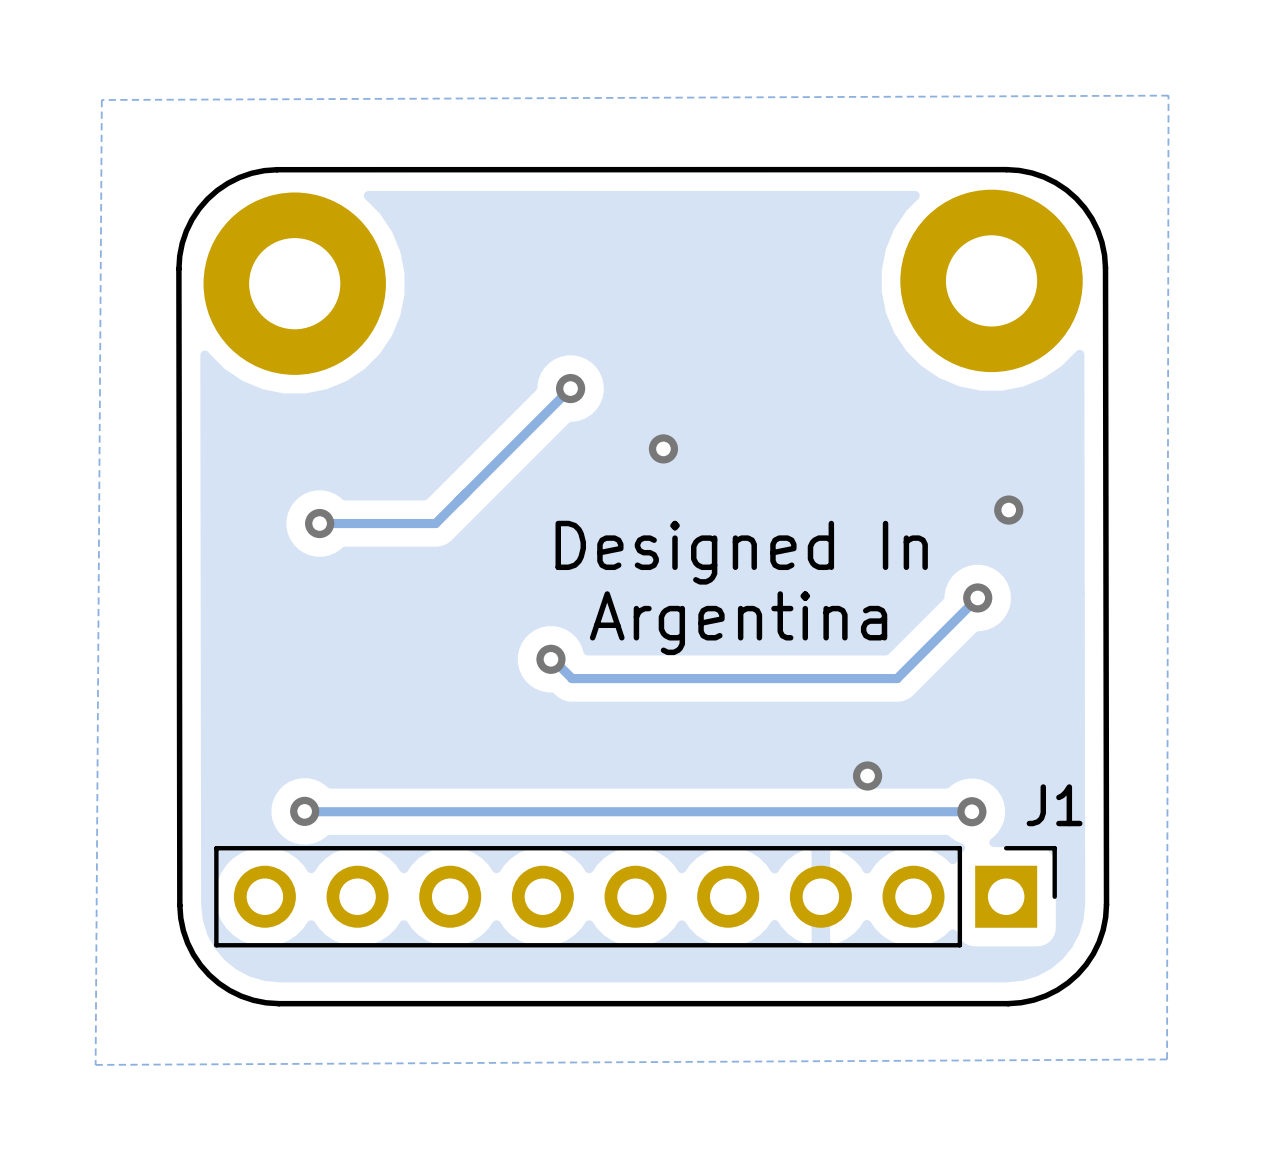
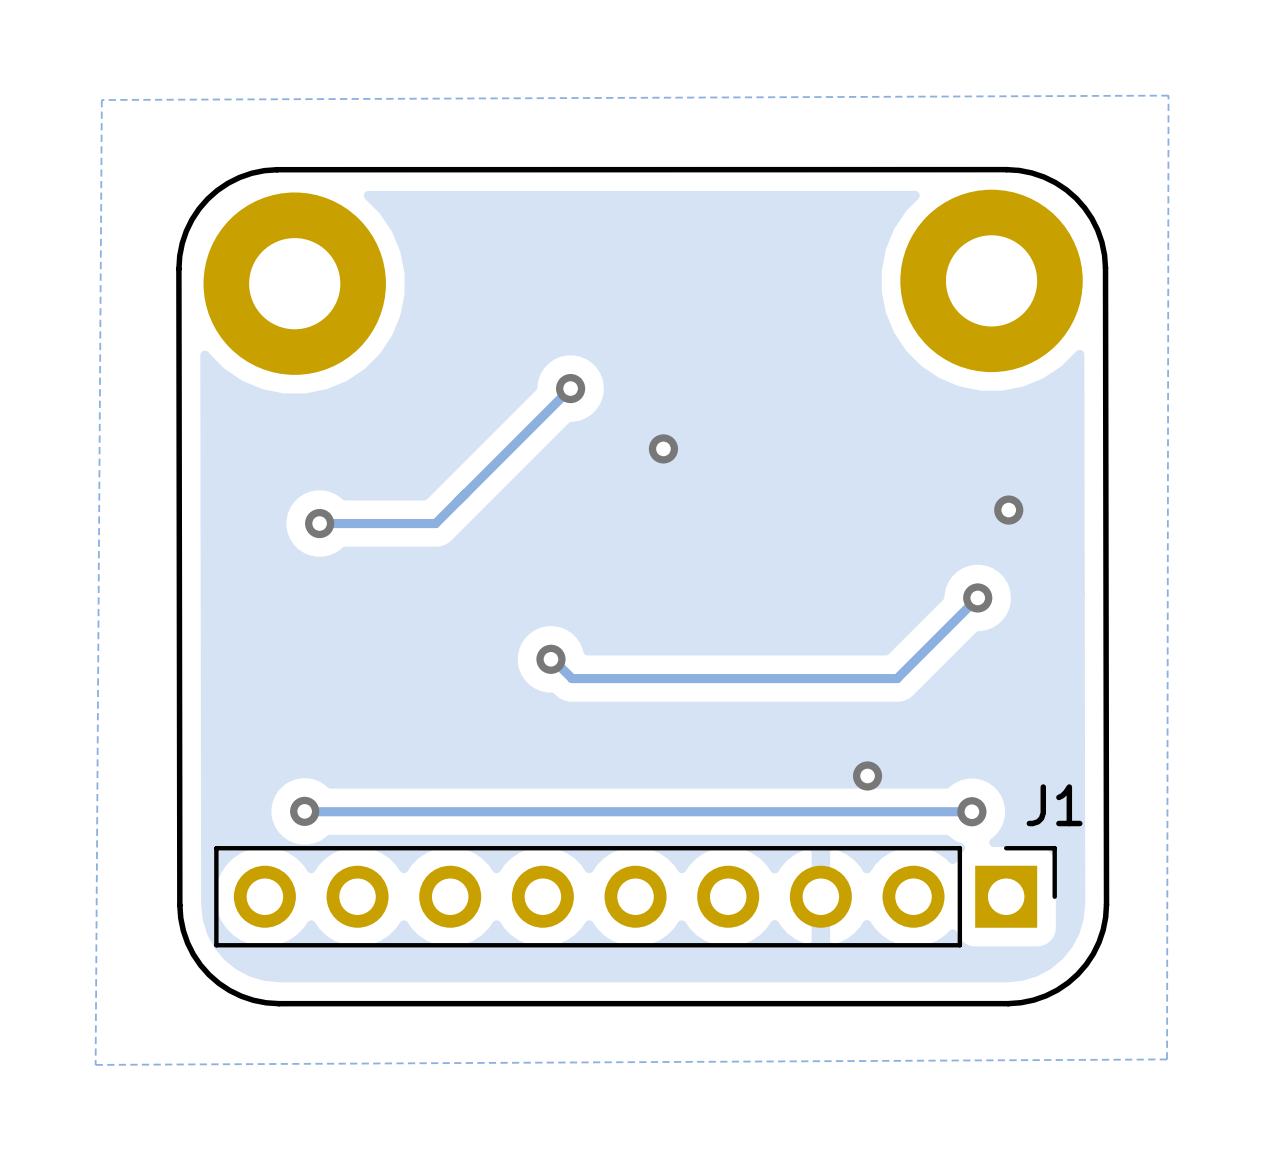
text: Designed In (741, 552) -> none
text: Argentina (738, 623) -> none

